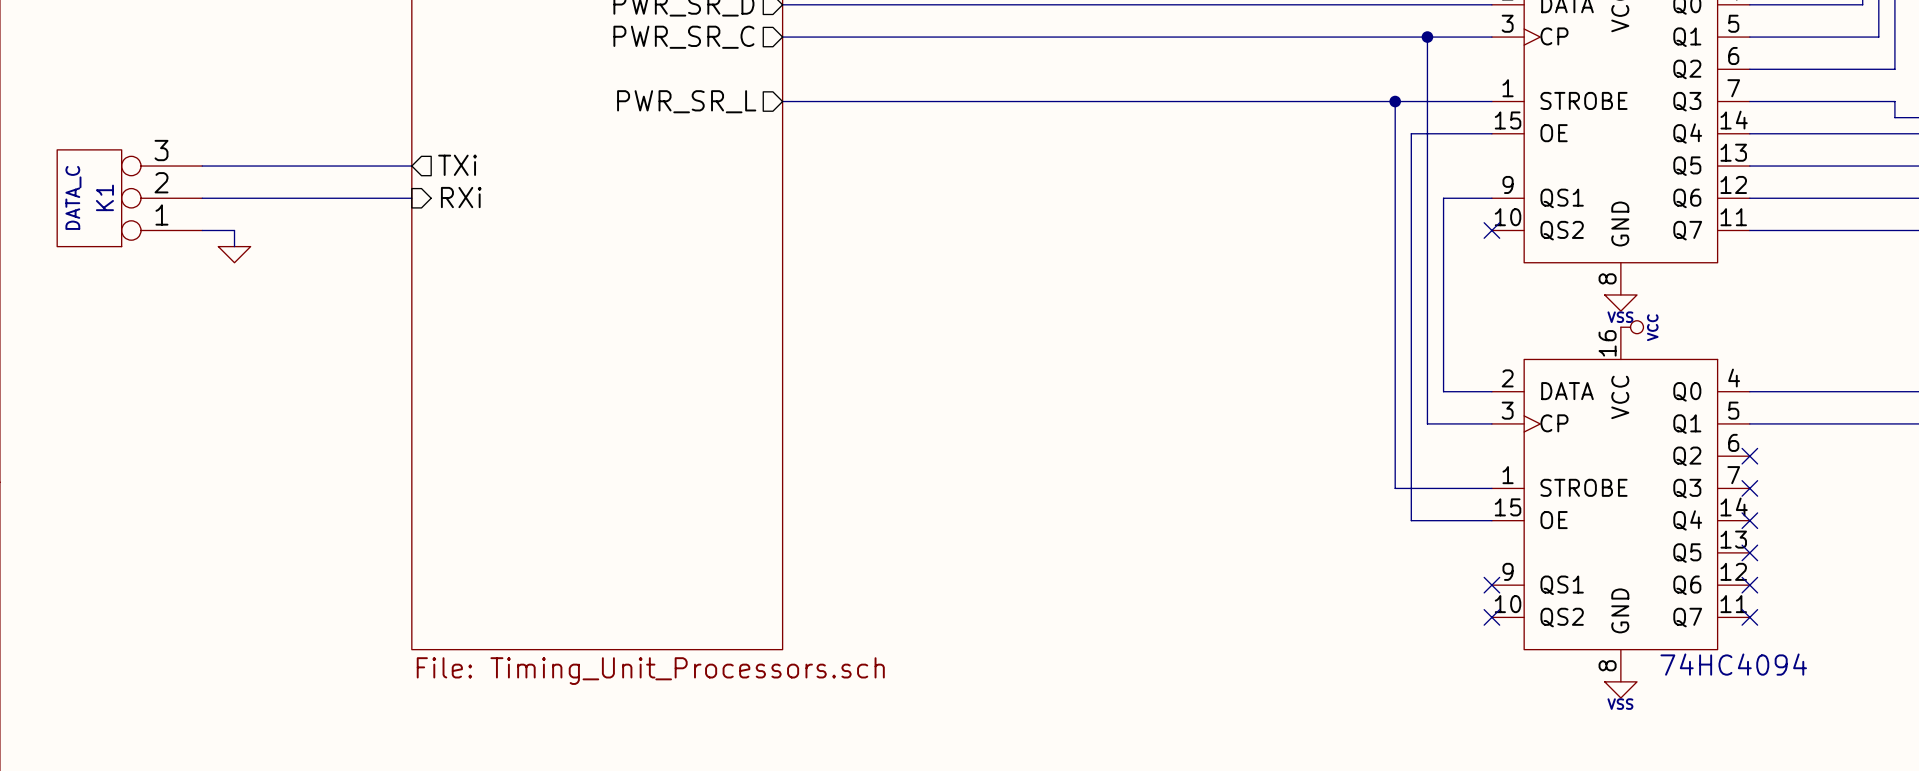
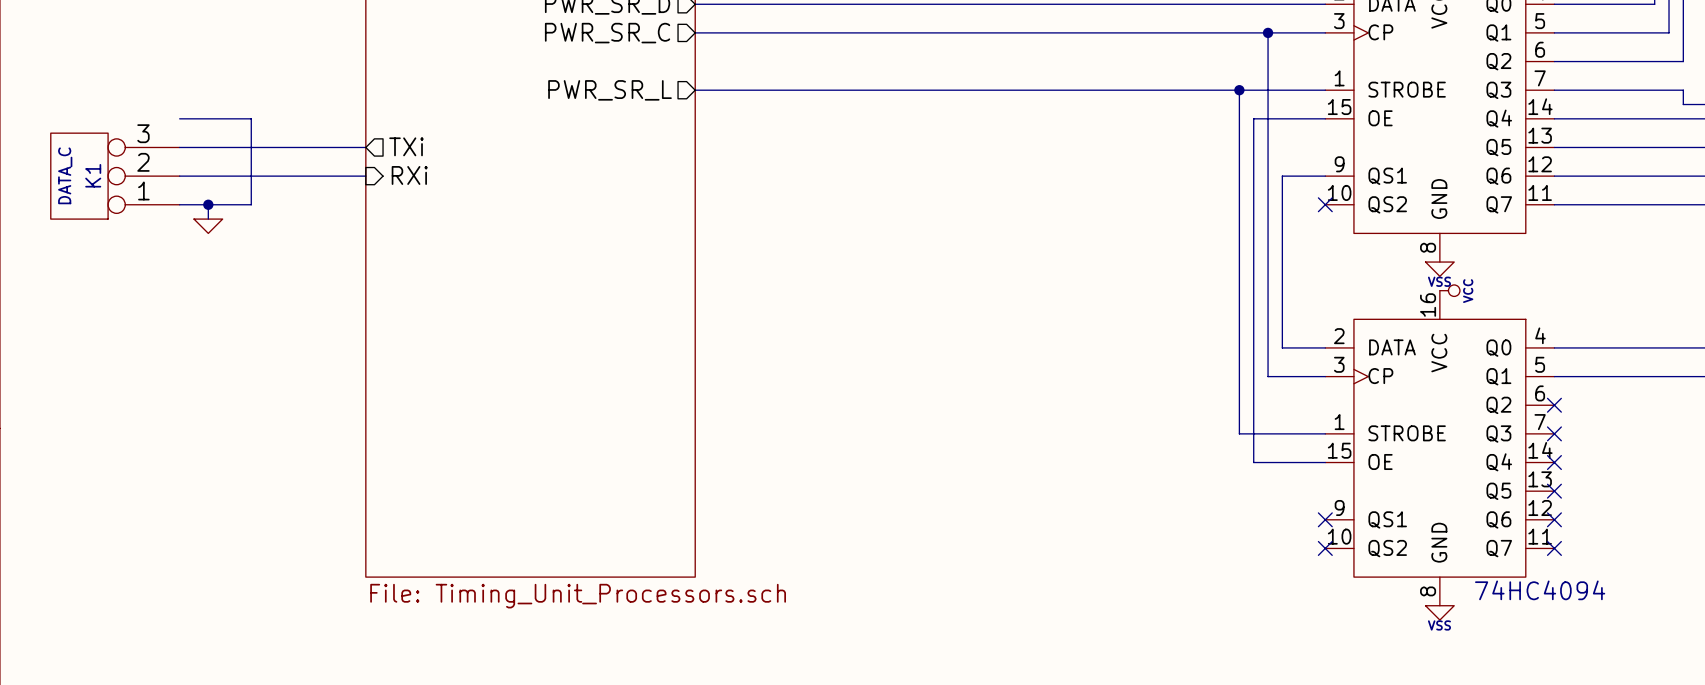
wire: none -> (179, 118) (251, 118) (251, 204) (208, 204)
junction: none -> (208, 204)

